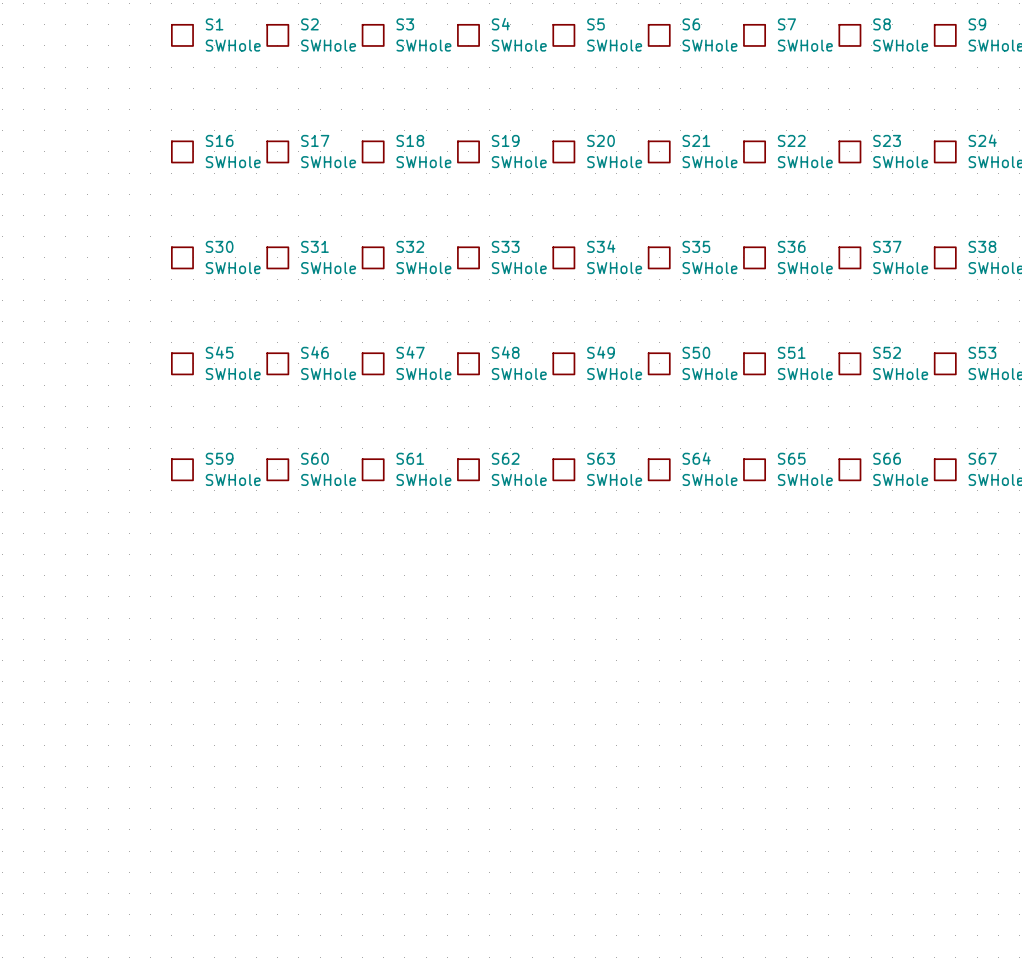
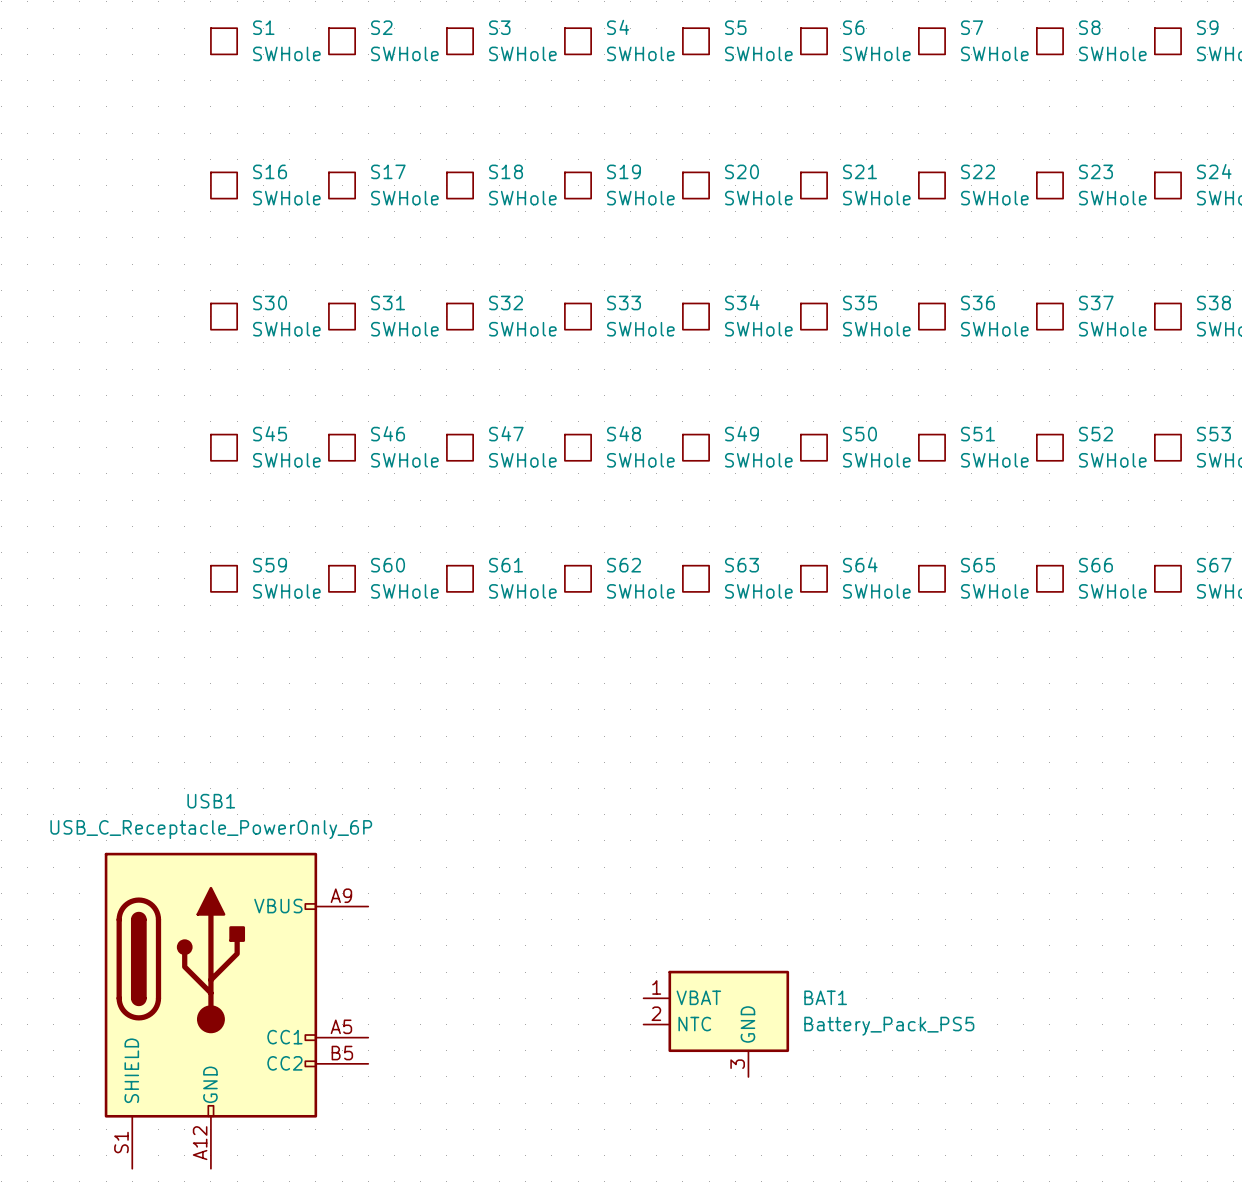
USB1: none -> USB_C_Receptacle_PowerOnly_6P (236, 1010)
BAT1: none -> Battery_Pack_PS5 (716, 1023)

